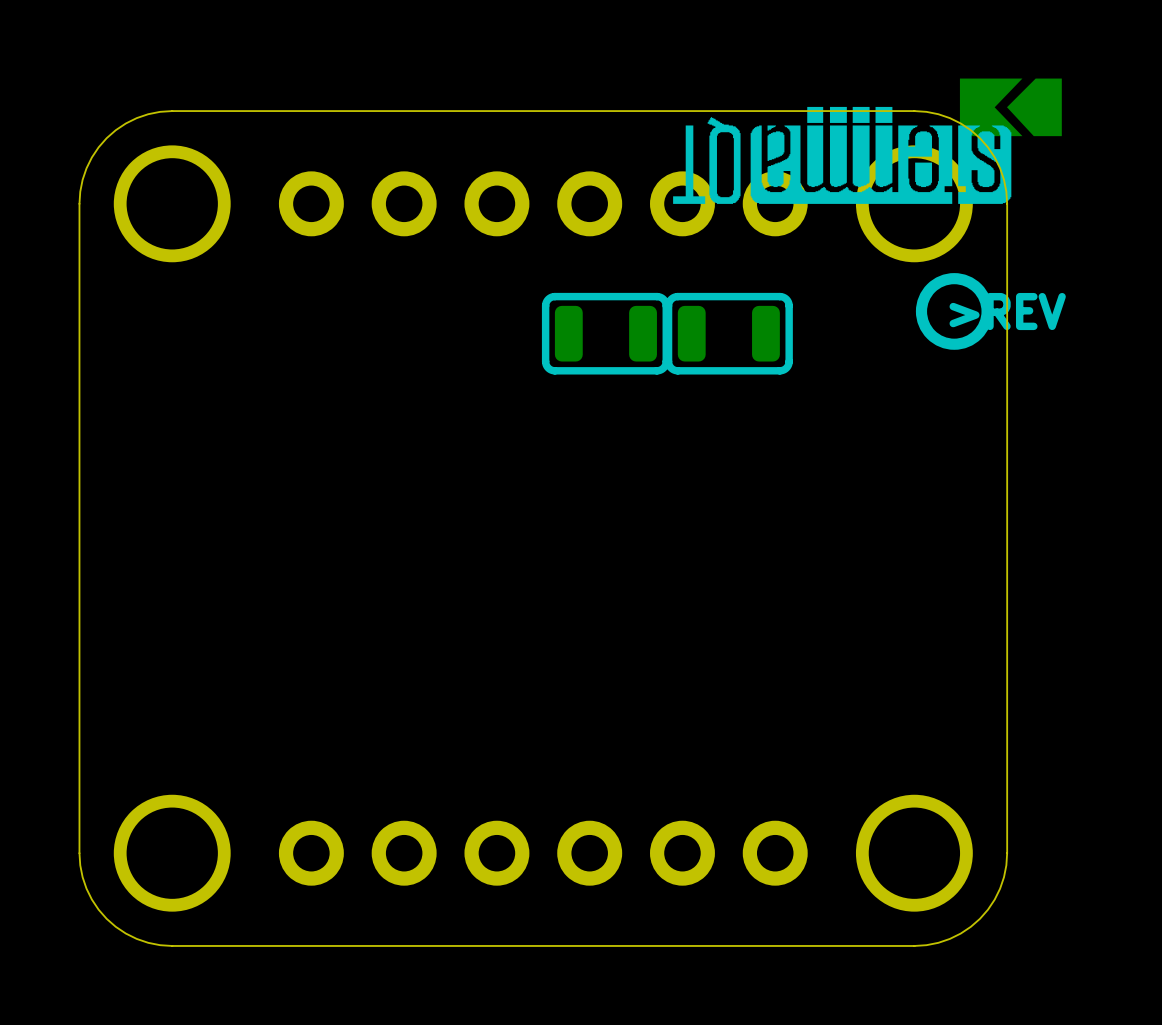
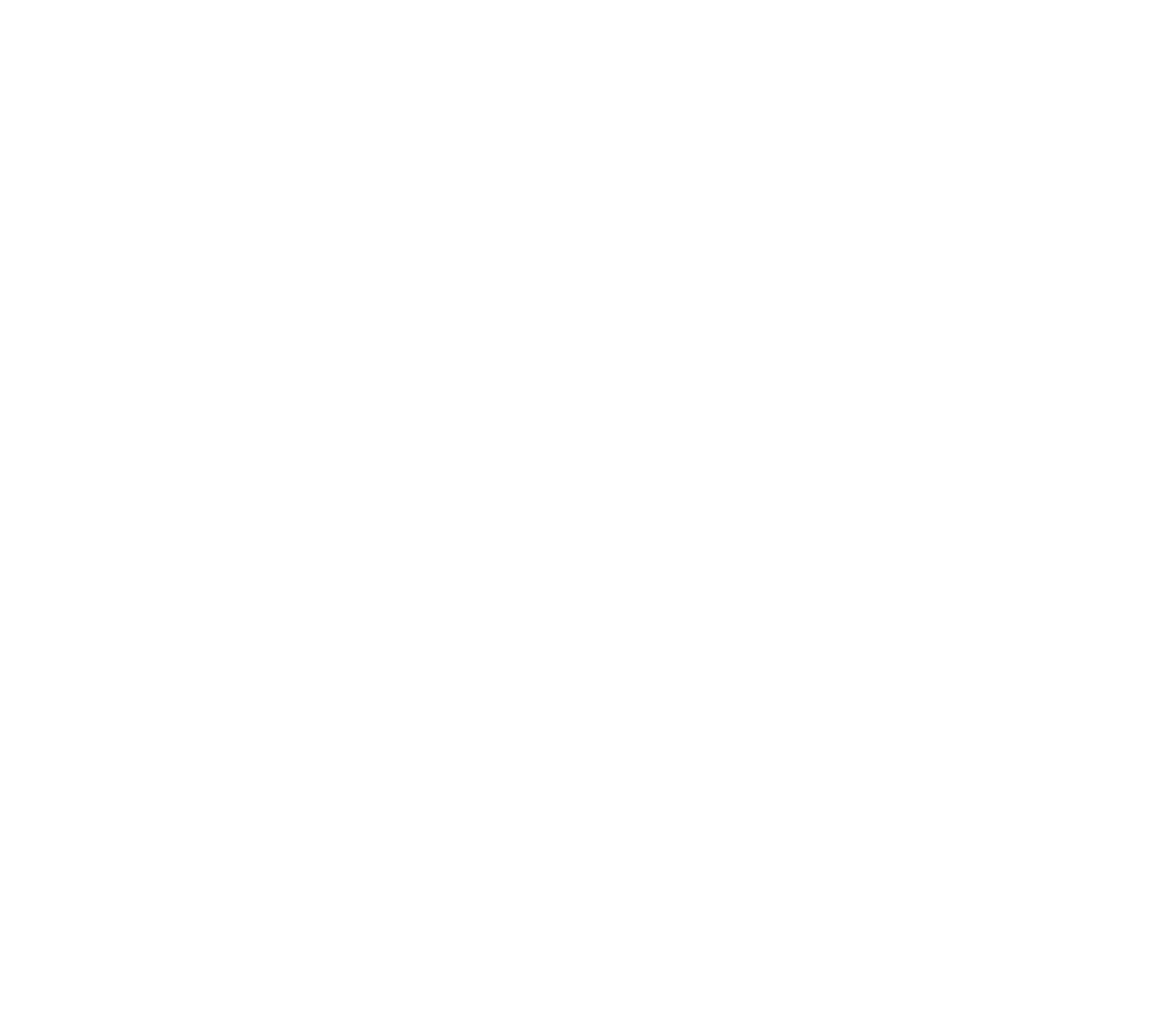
part: (570, 512) -> none

